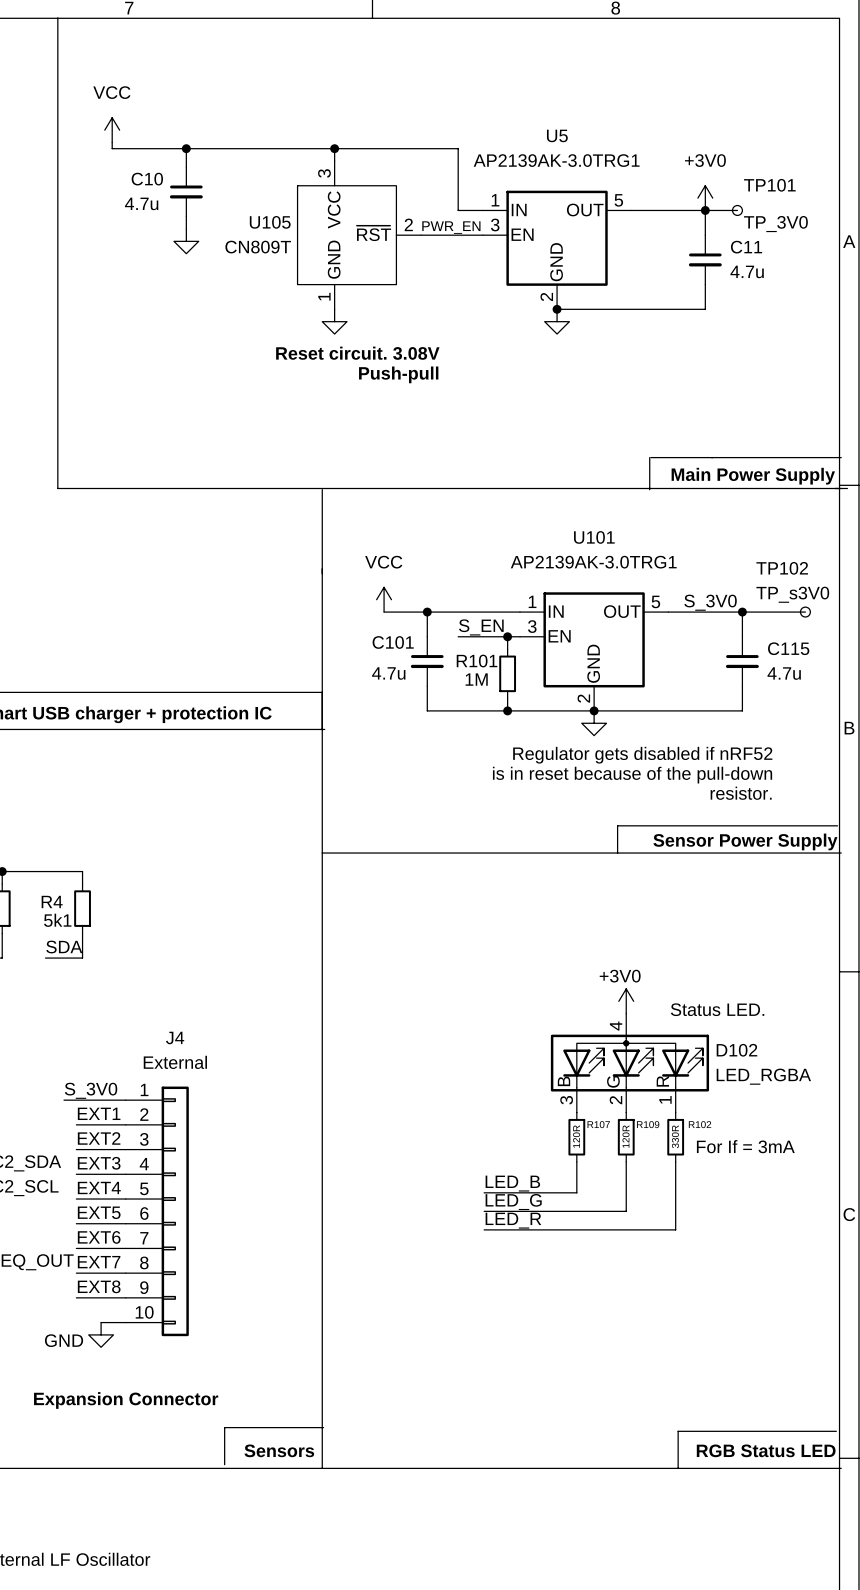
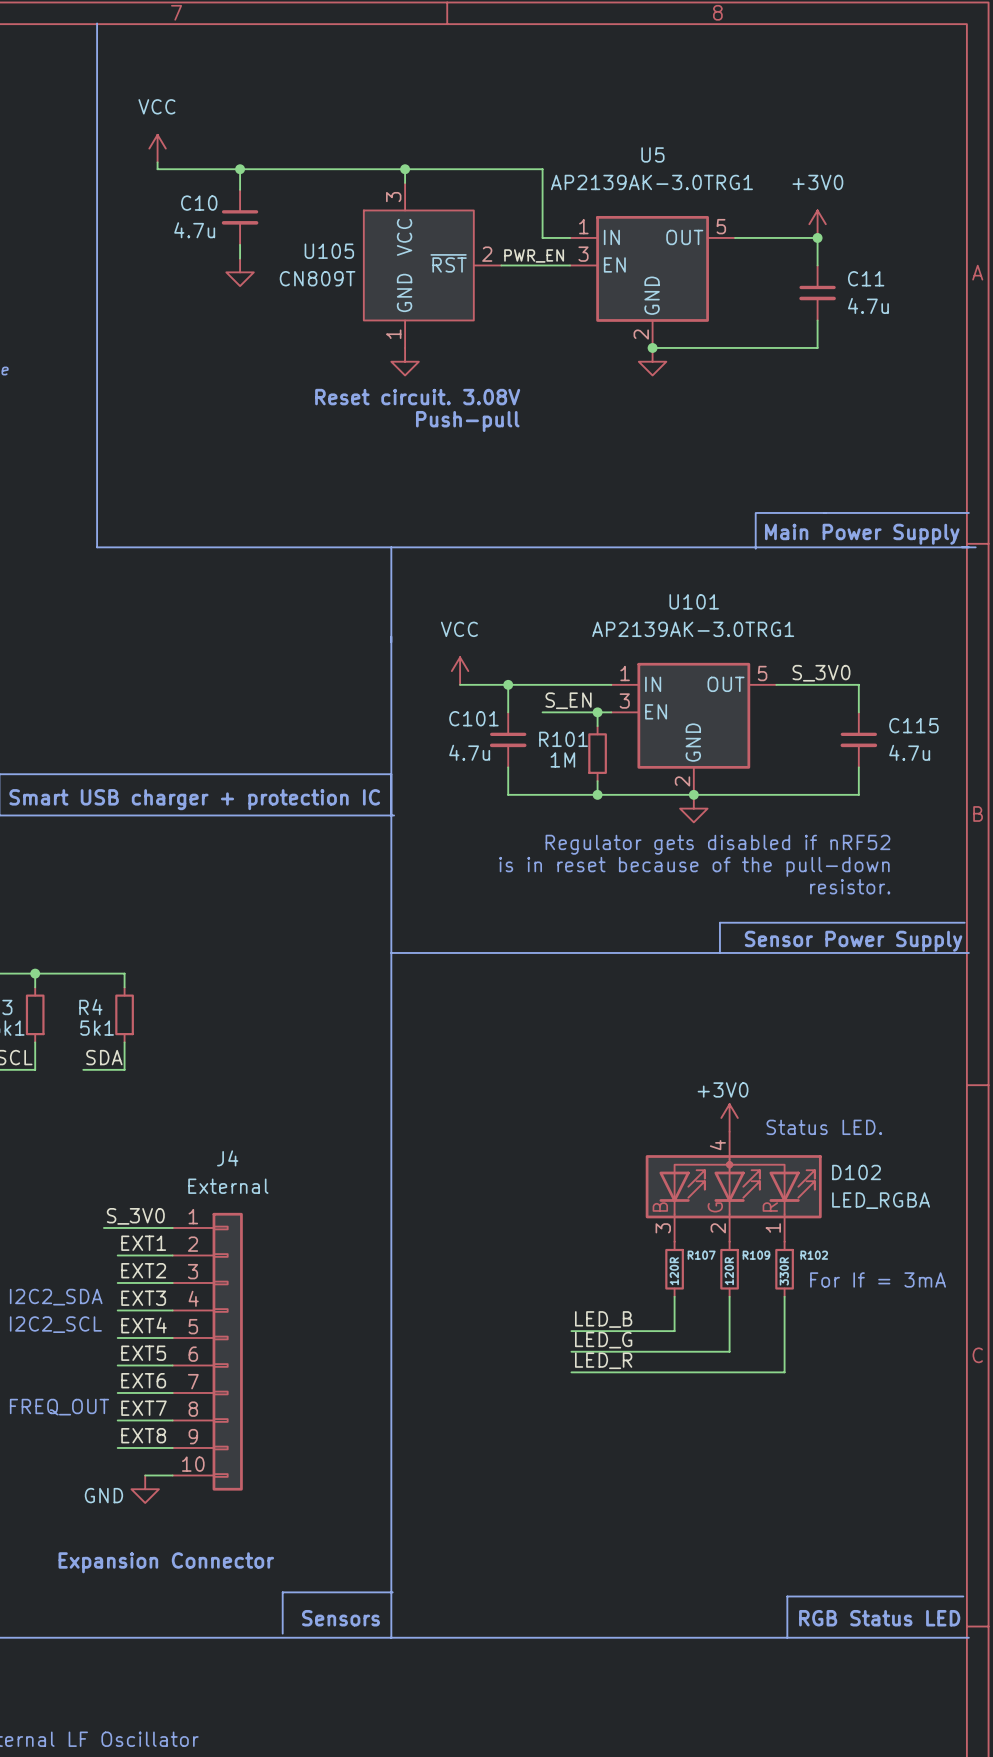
wire: (705, 210) (737, 210) -> none
TP101: TP_3V0 (737, 210) -> none
wire: (742, 612) (805, 612) -> none
junction: (742, 612) -> none
TP102: TP_s3V0 (805, 612) -> none

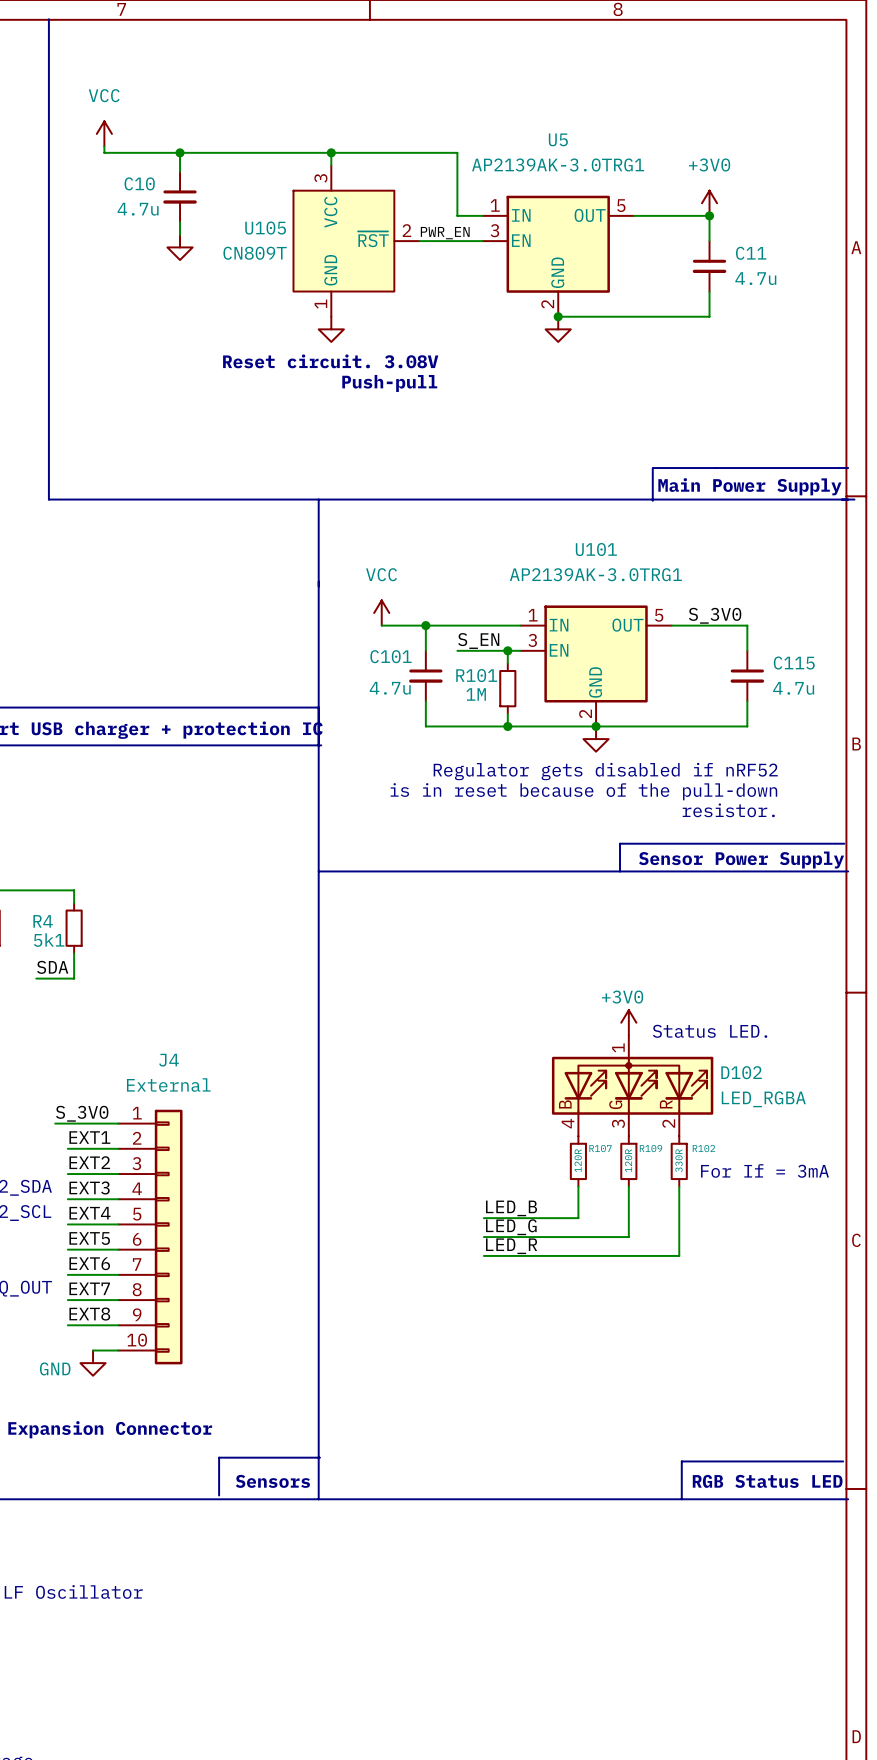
D102 pin number: 4 (717, 1145) -> 1 (618, 1047)
D102 pin number: 1 (773, 1227) -> 2 (668, 1123)
D102 pin number: 3 (663, 1228) -> 4 (568, 1123)
D102 pin number: 2 (718, 1228) -> 3 (618, 1123)

